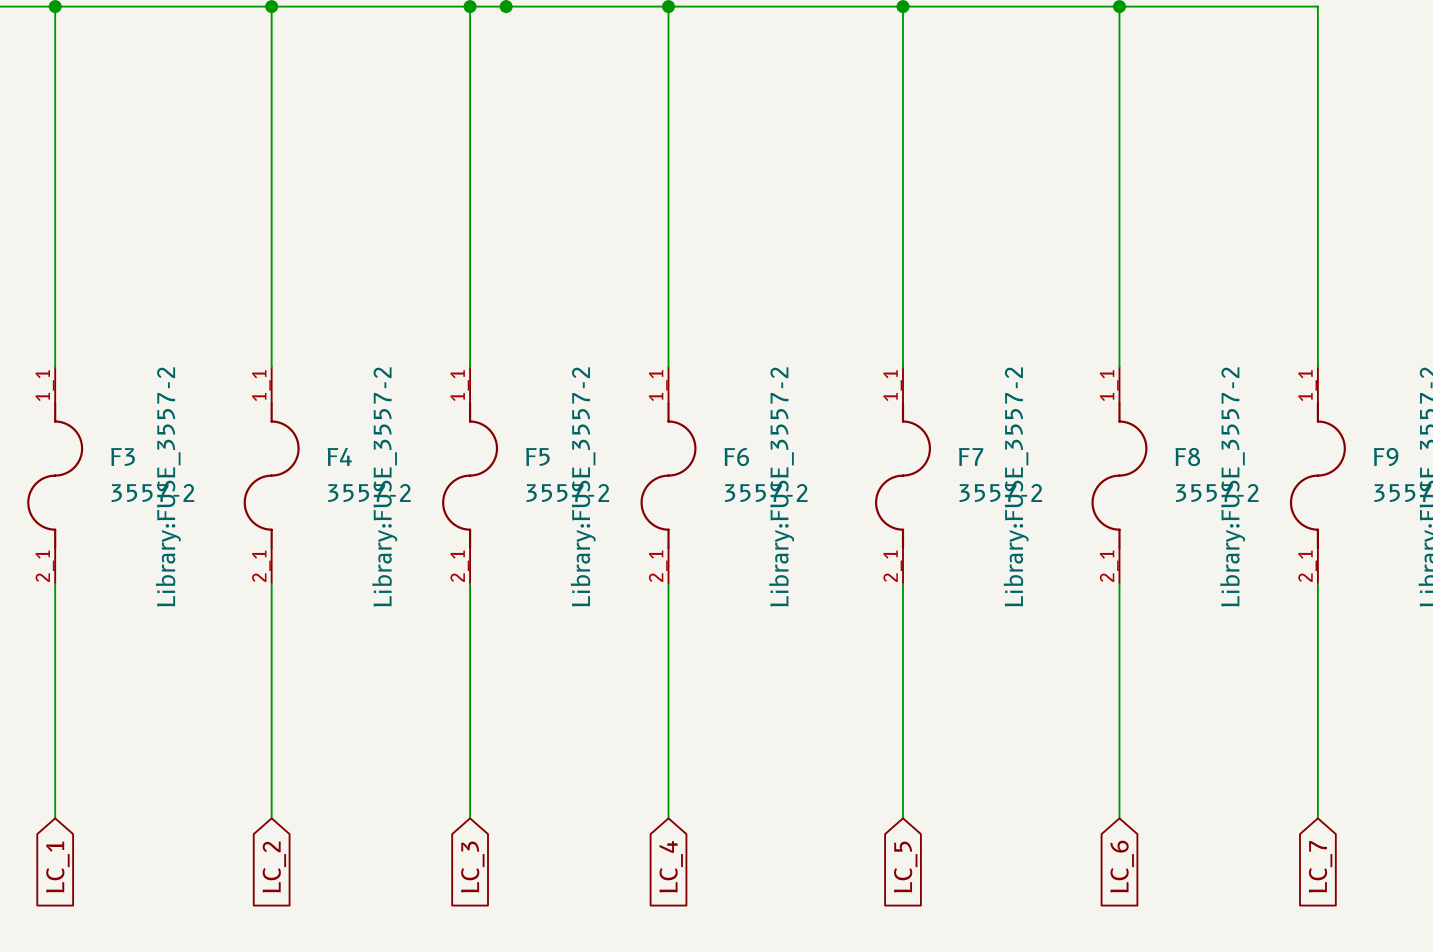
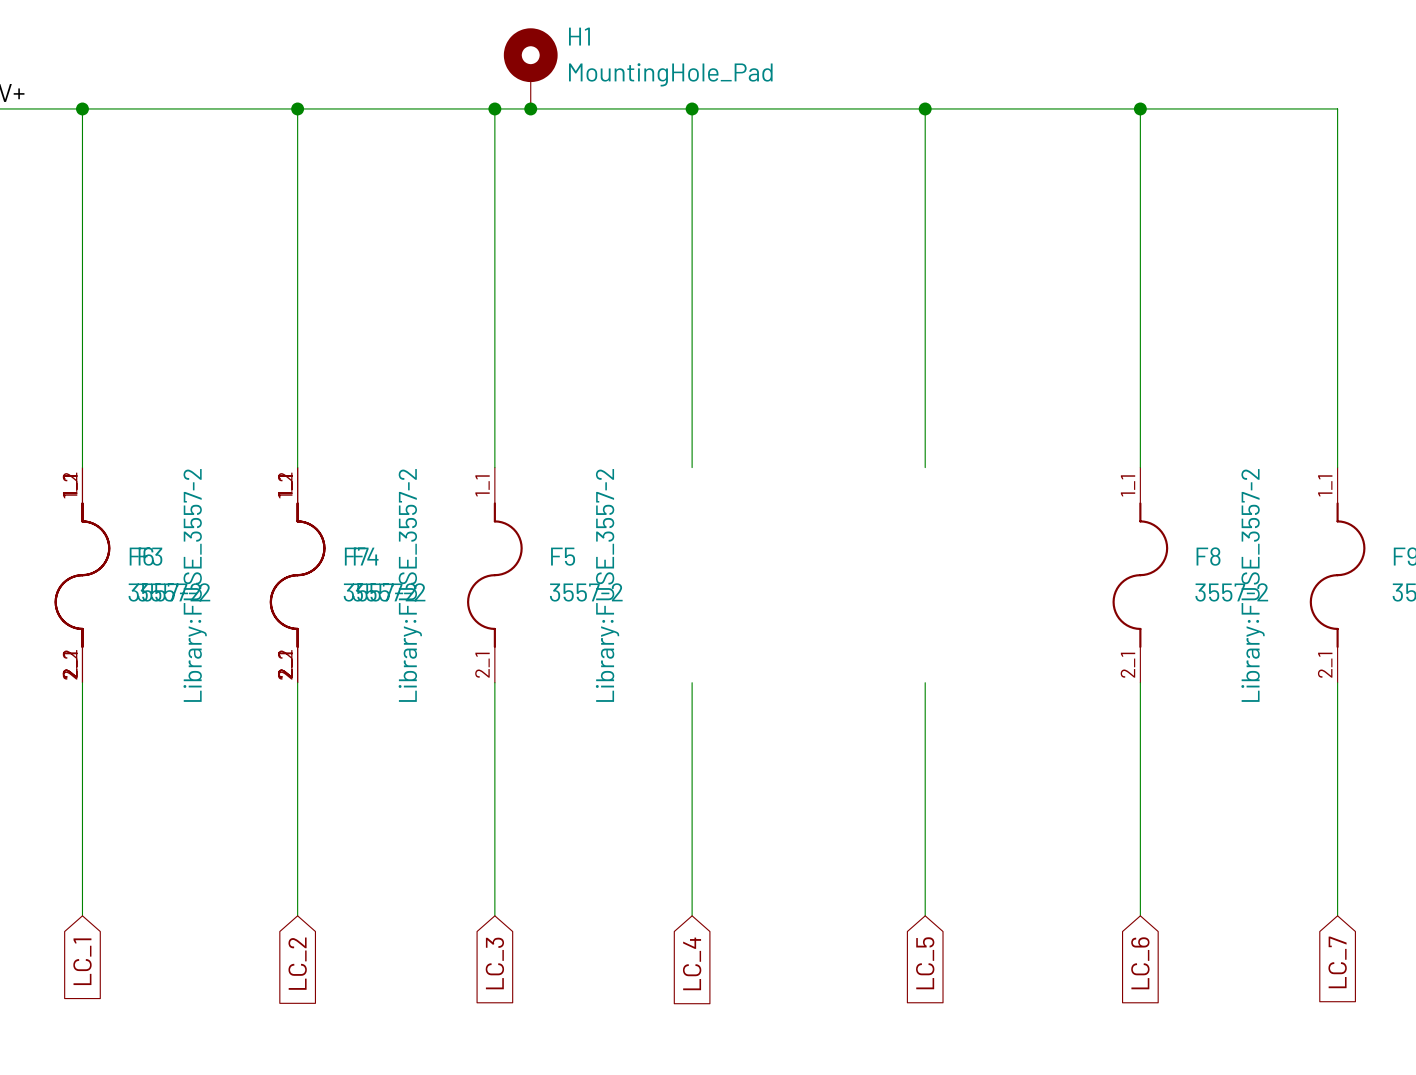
F6 symbol: [640, 367, 697, 584] -> [54, 467, 111, 683]
F7 symbol: [874, 367, 932, 584] -> [269, 467, 326, 683]
F6 text: Library:FUSE_3557-2 (781, 486) -> none
F7 text: Library:FUSE_3557-2 (1016, 486) -> none

